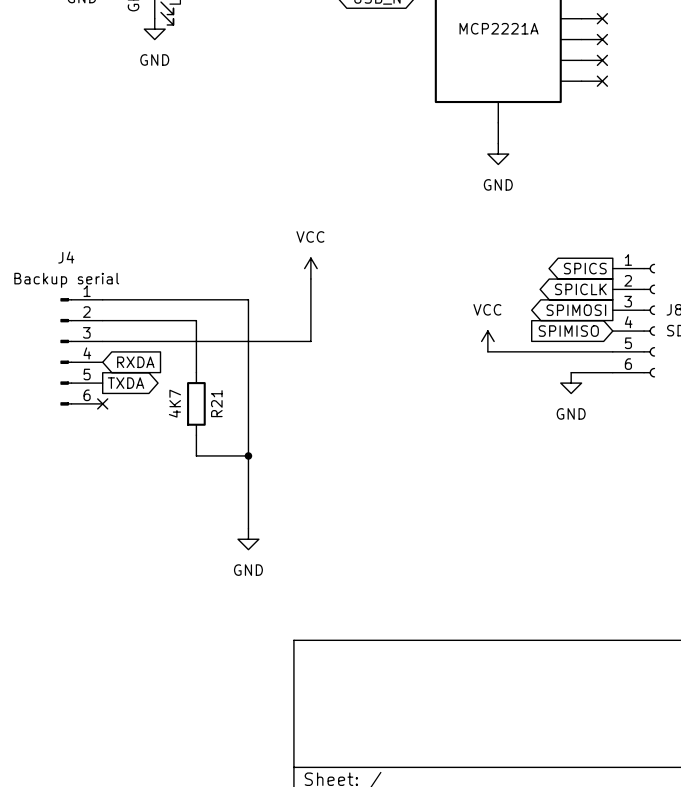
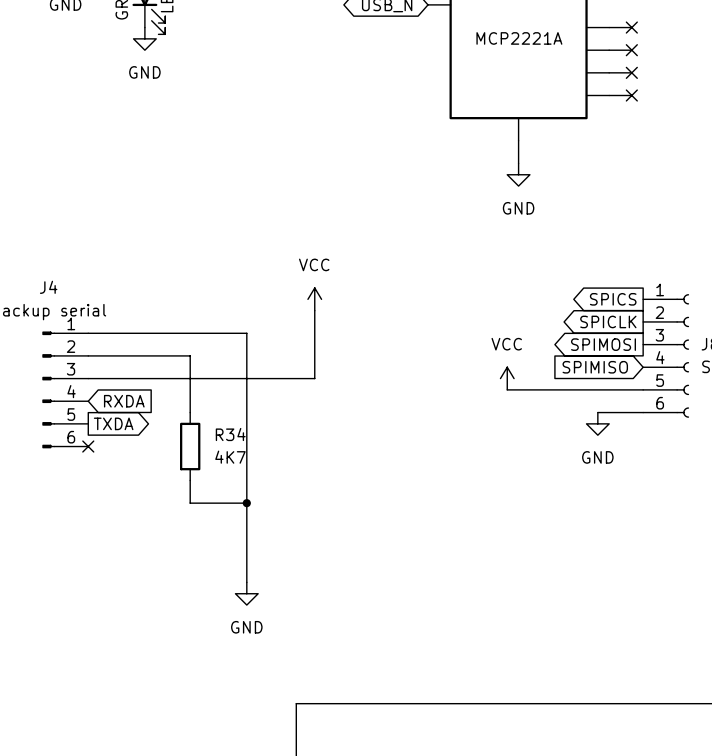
R21 value rotation: 0° (174, 403) -> 90° clockwise (230, 457)
R21 value position: 4K7 (174, 403) -> 4K7 (230, 457)
R21 name: R21 (216, 403) -> R34 (230, 434)

